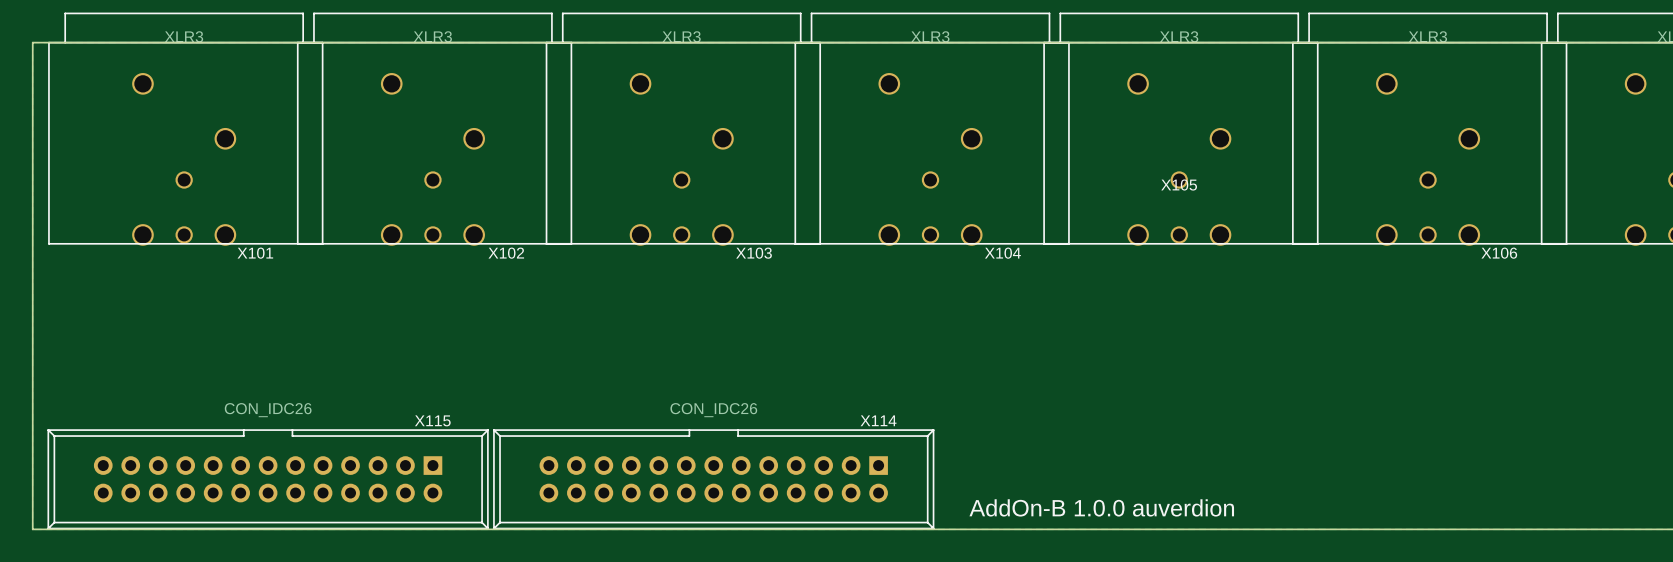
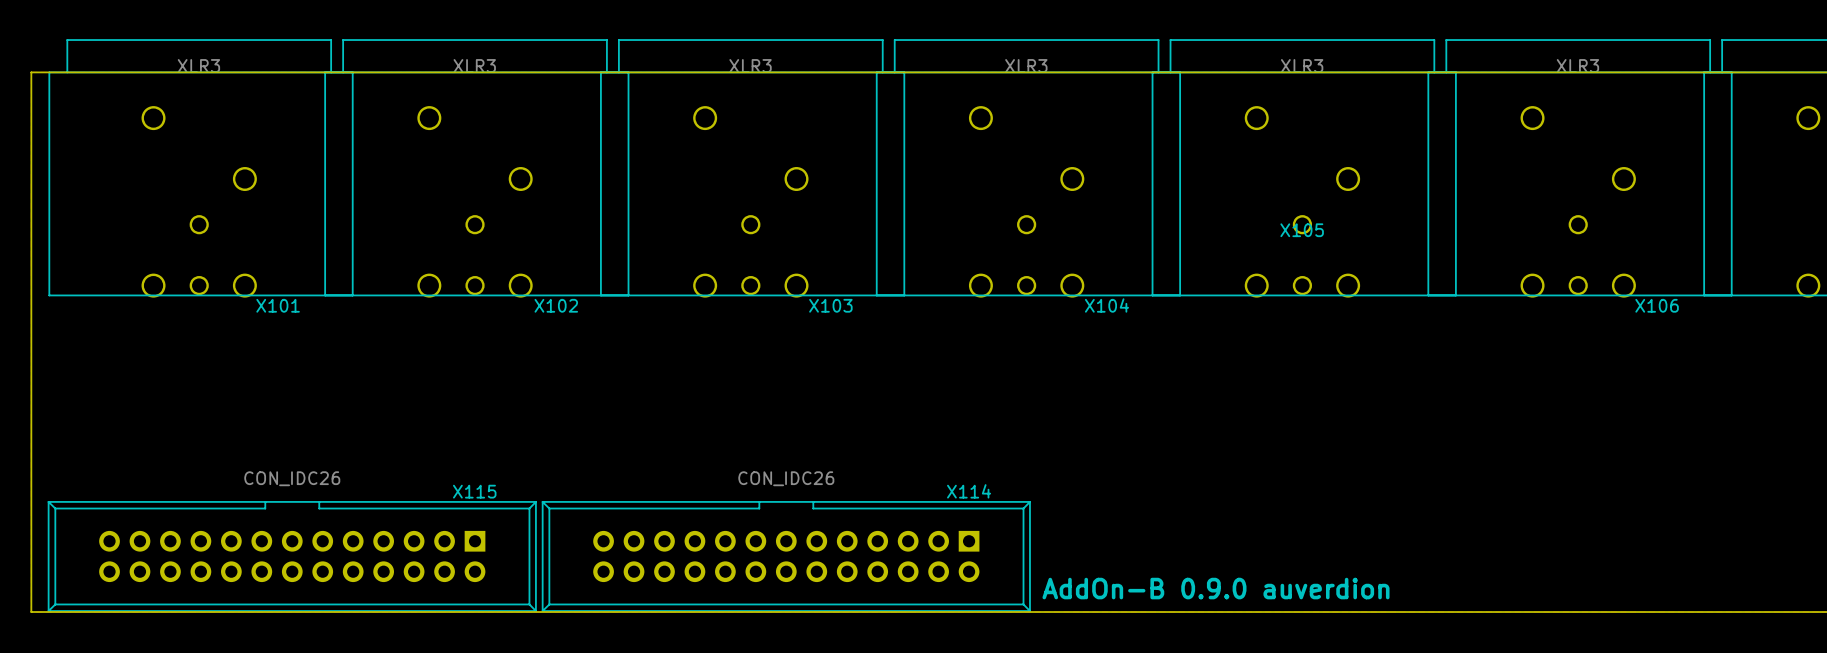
text: AddOn-B 1.0.0 auverdion (1101, 507) -> AddOn-B 0.9.0 auverdion (1216, 588)

